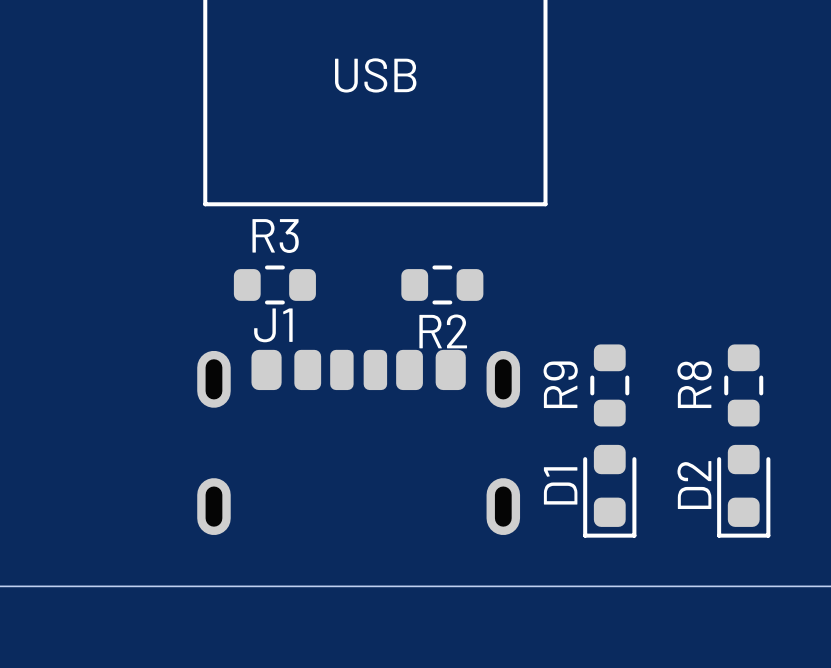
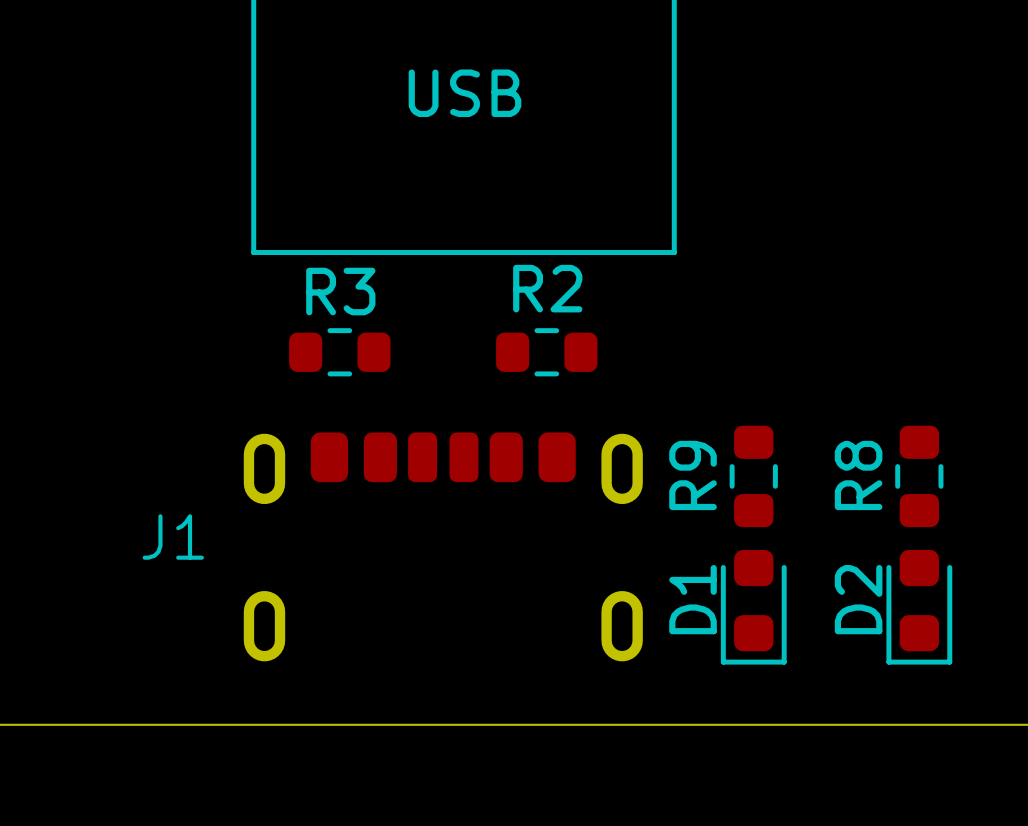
J1 name position: J1 (273, 325) -> J1 (173, 536)
R2 name position: R2 (443, 331) -> R2 (547, 288)

